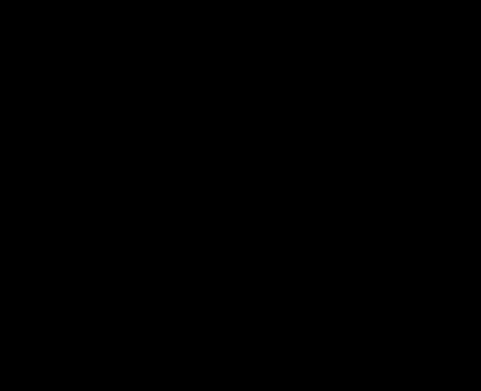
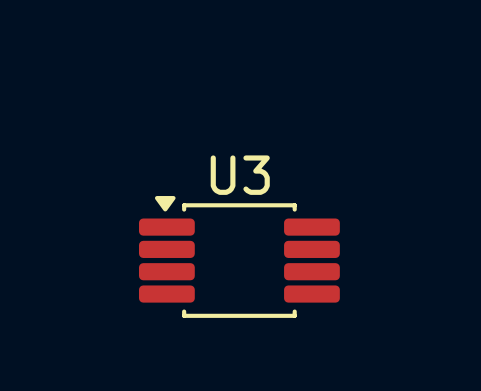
U3: none -> (239, 256)

